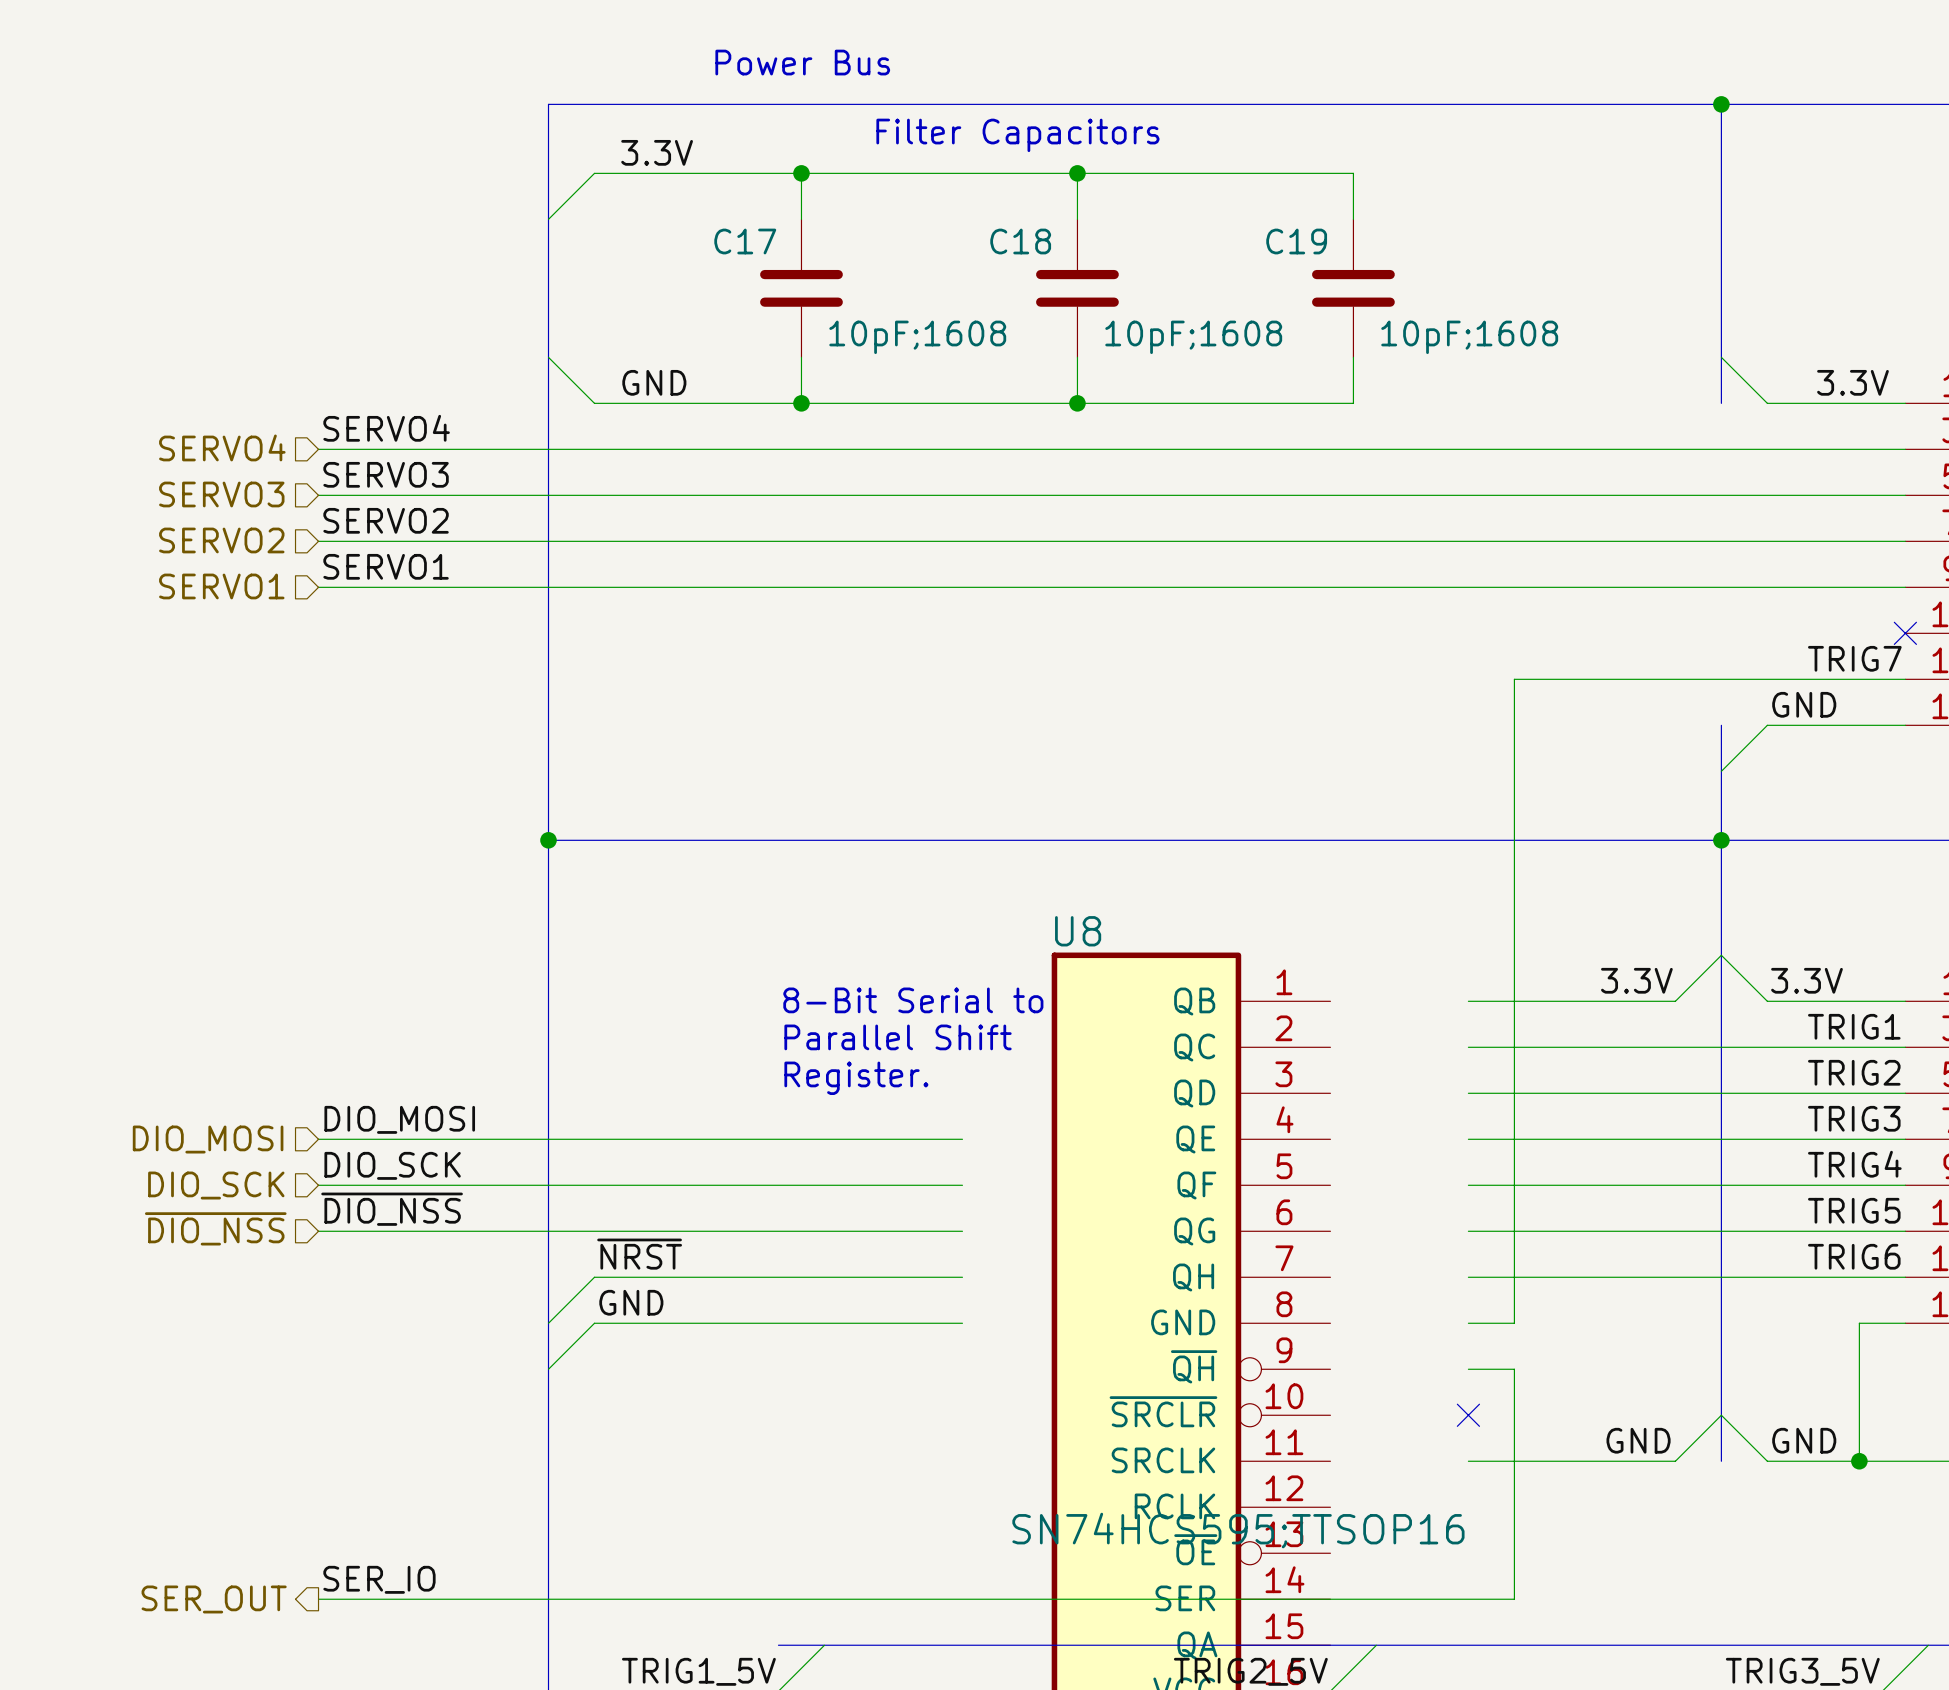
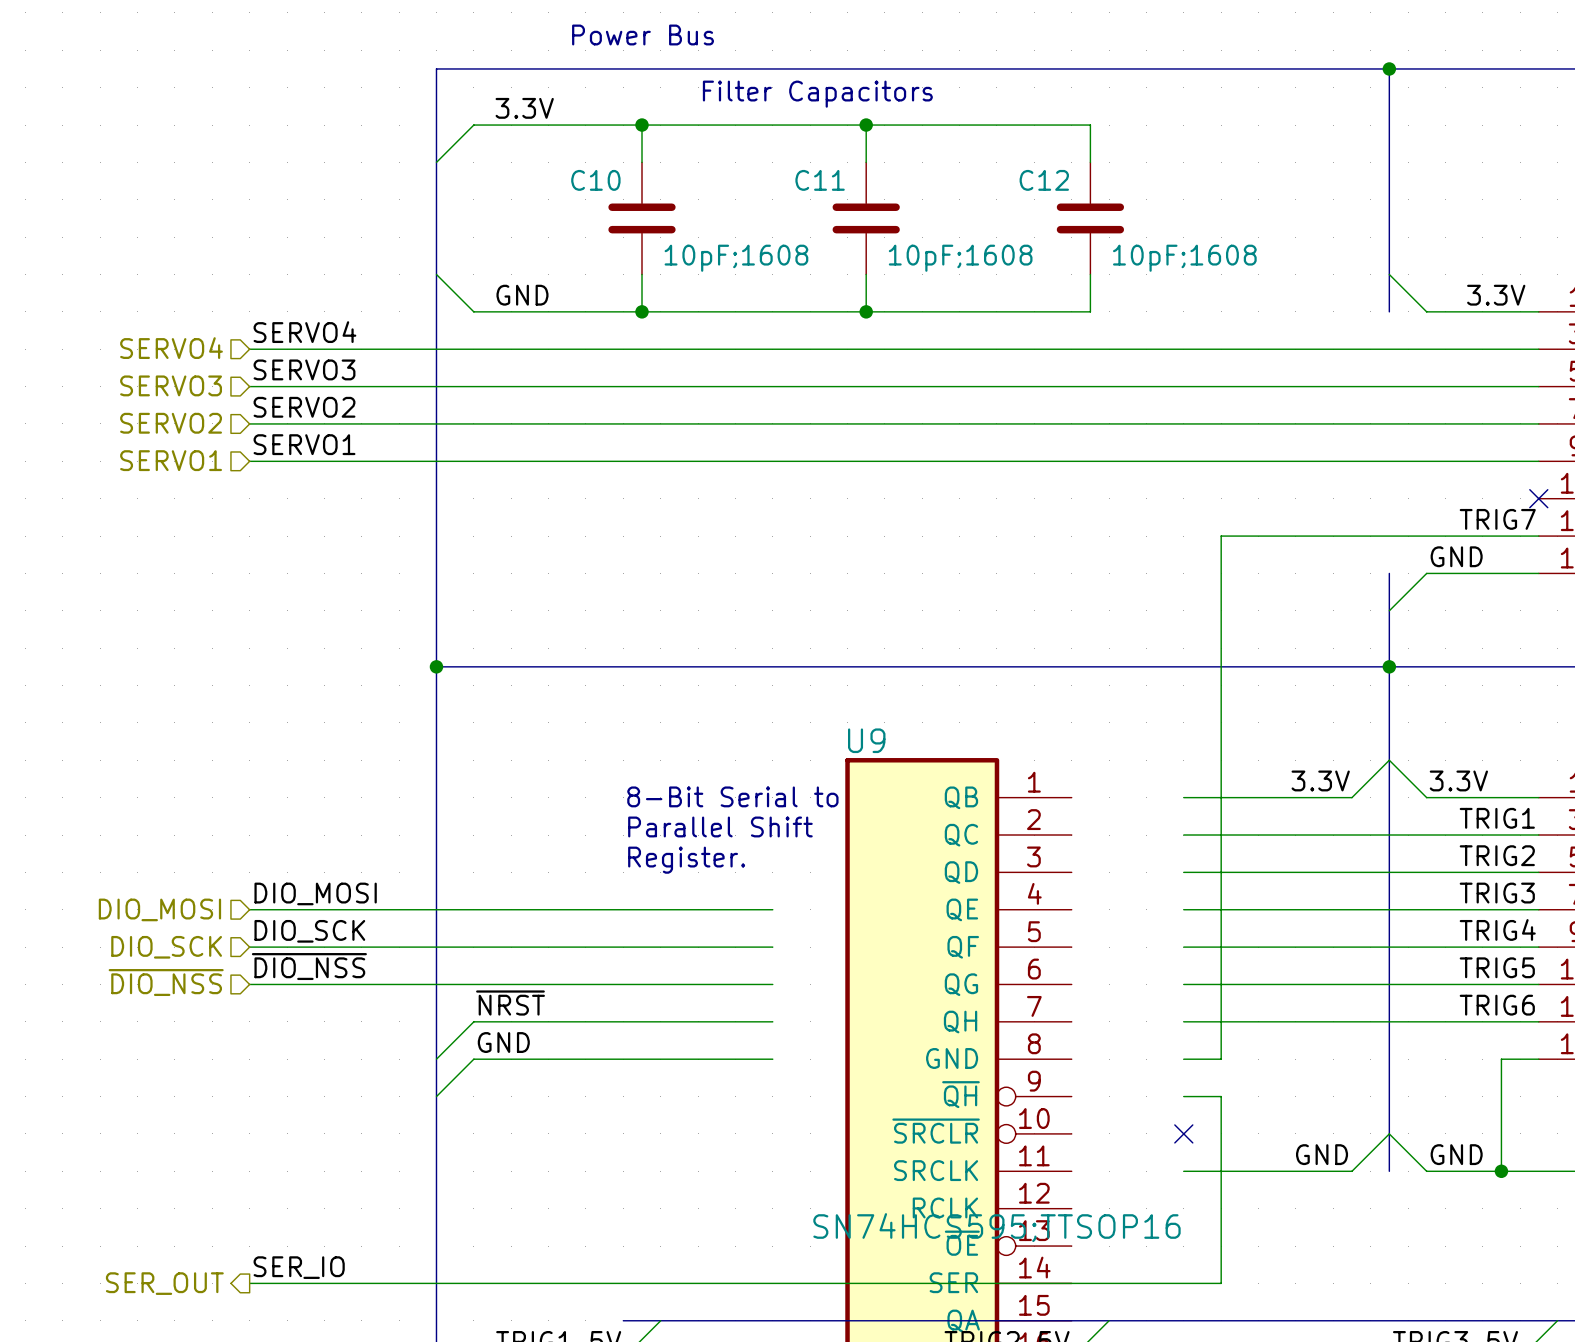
C17 name: C17 (745, 241) -> C10 (595, 180)
C18 name: C18 (1020, 241) -> C11 (820, 180)
C19 name: C19 (1296, 241) -> C12 (1044, 180)
U8 name: U8 (1078, 931) -> U9 (866, 740)

